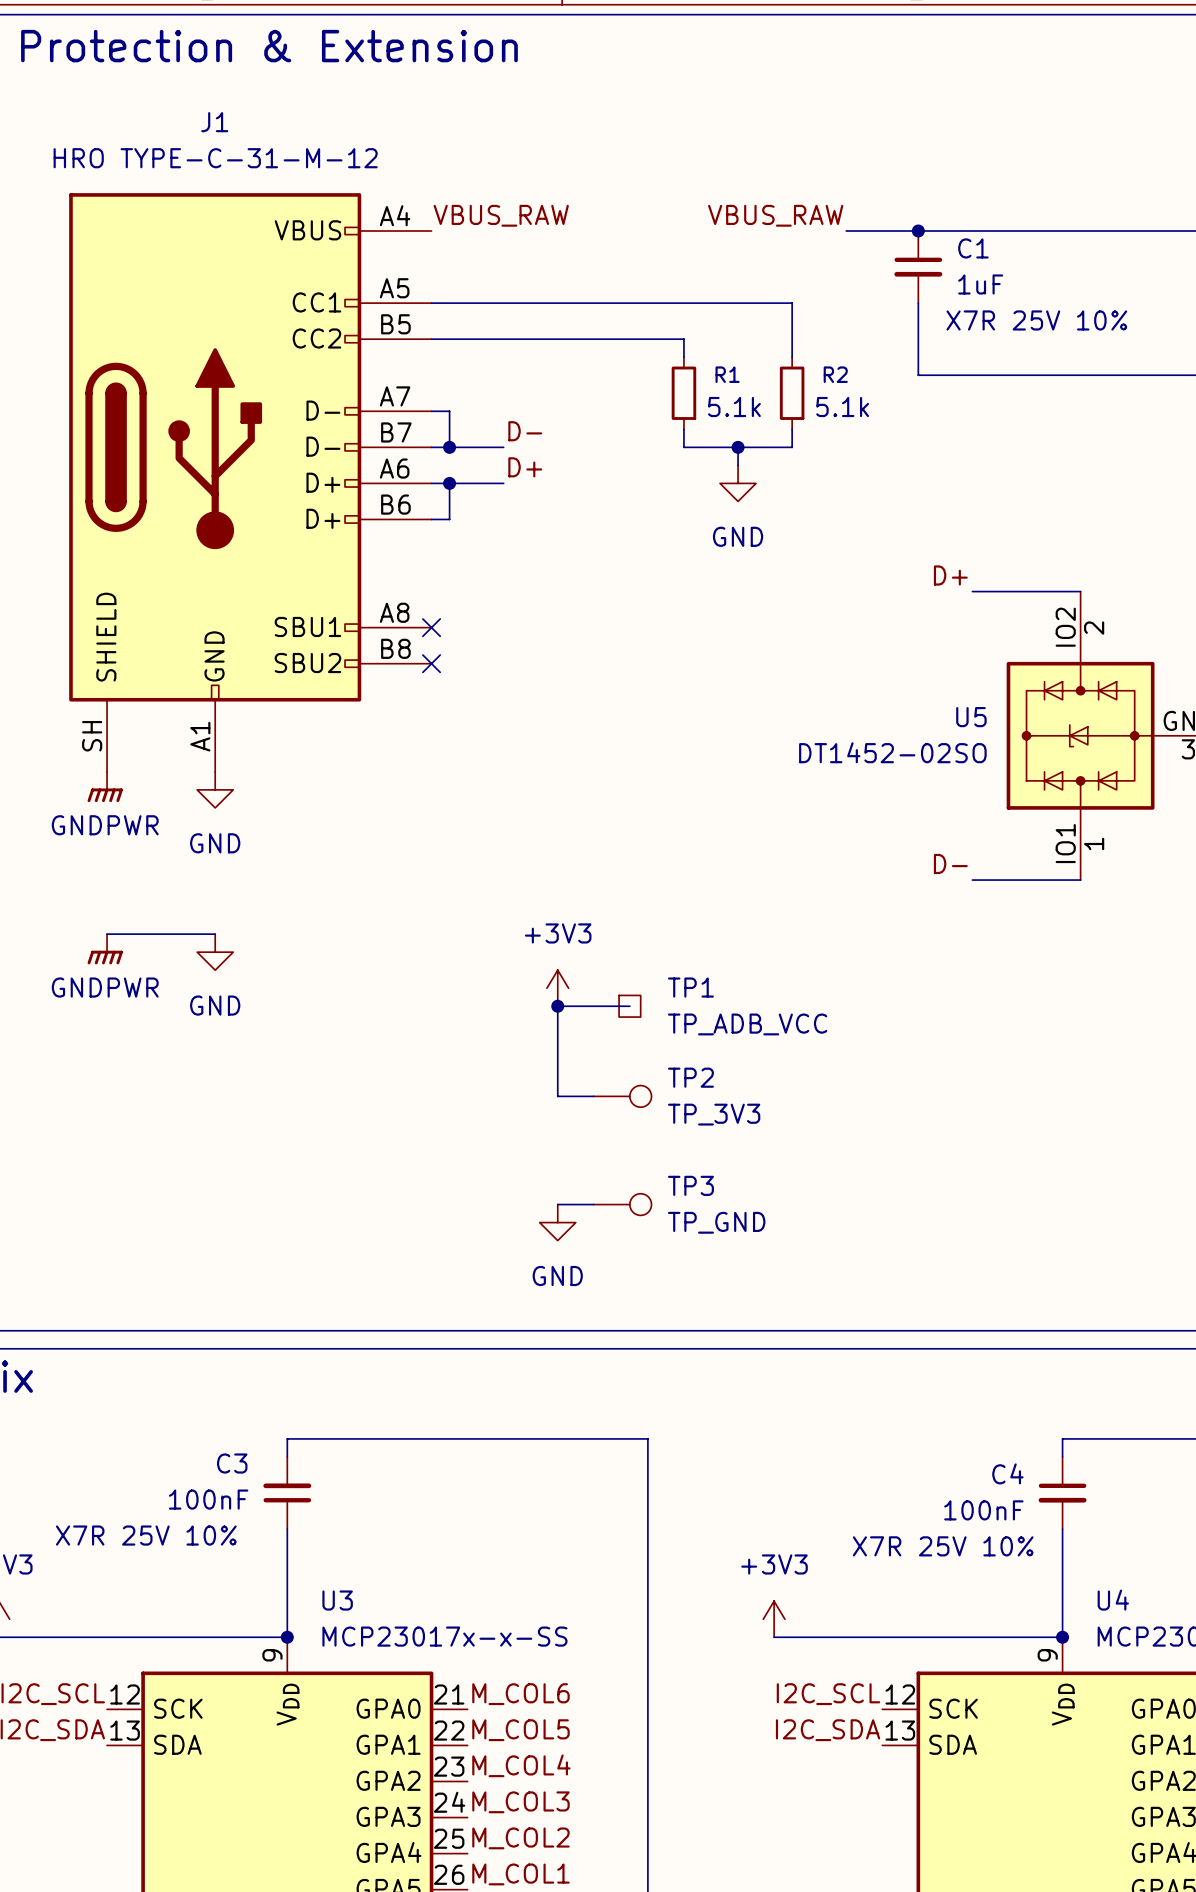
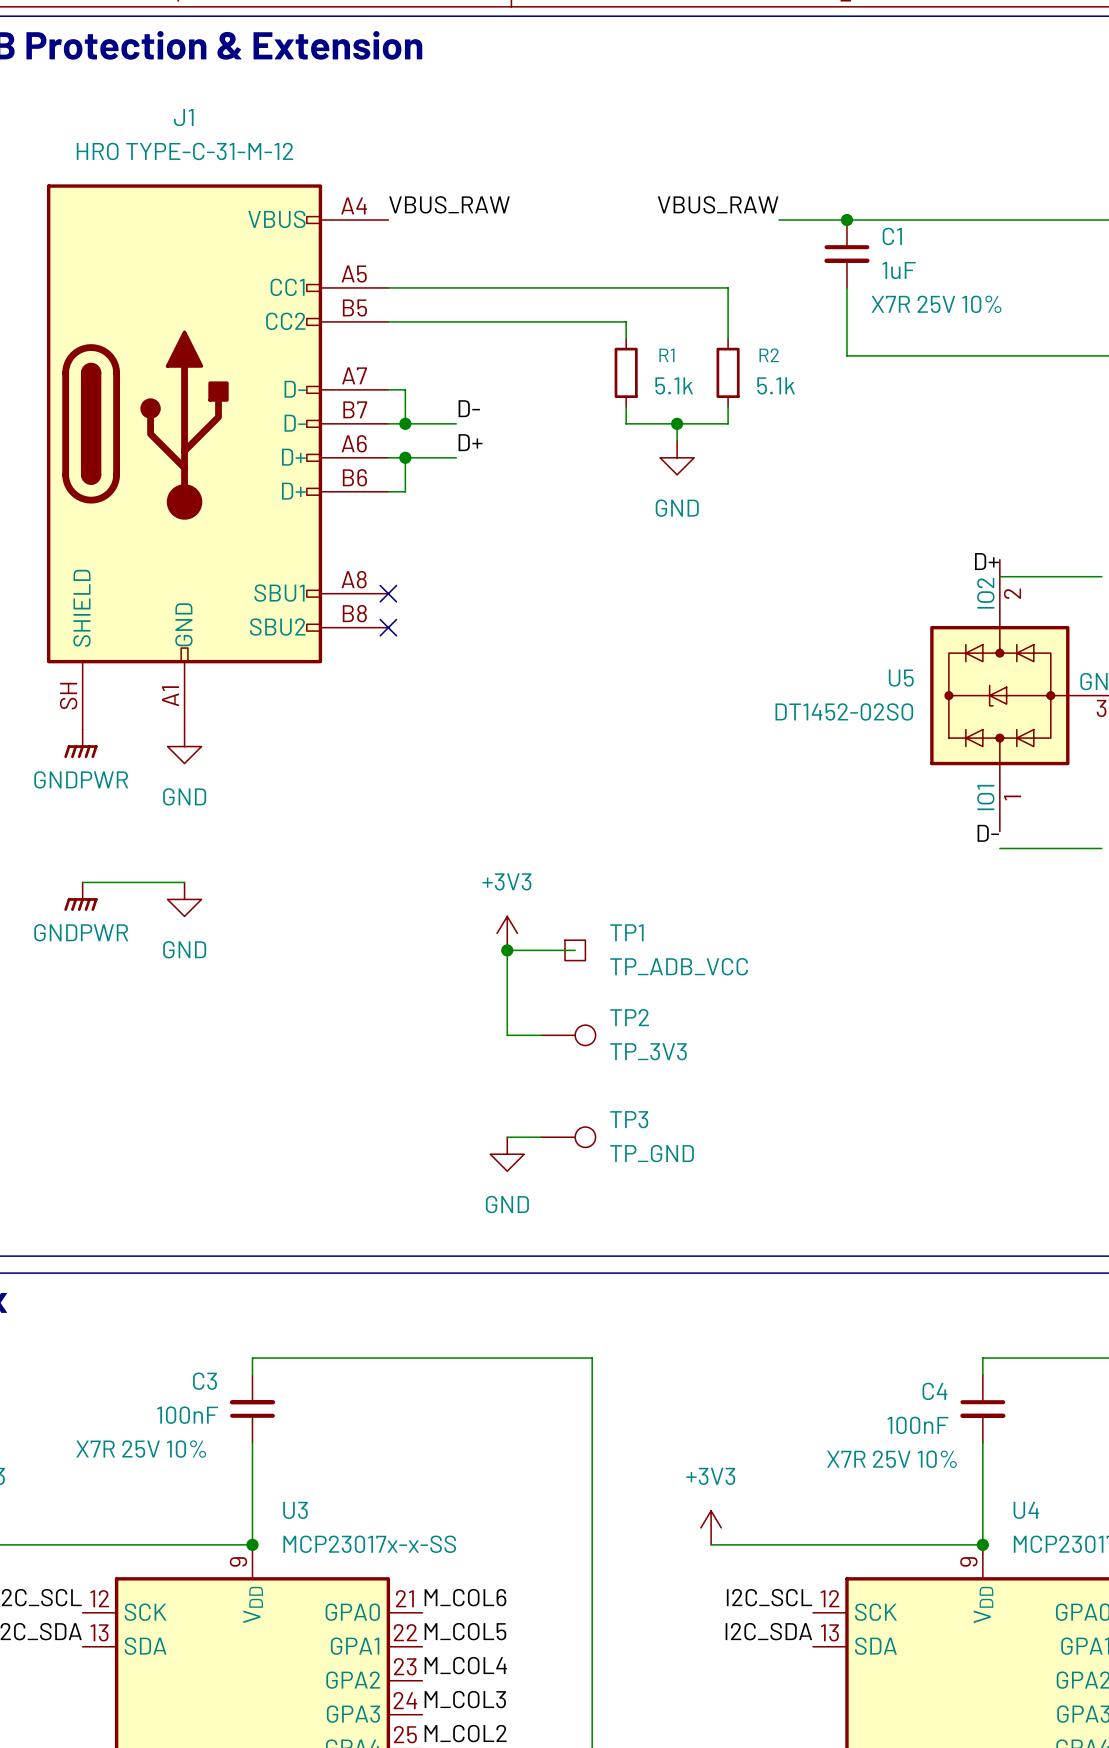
label position: D+ (950, 575) -> D+ (986, 561)
wire: (972, 591) (1080, 591) -> (999, 576) (1101, 576)
label position: D- (950, 863) -> D- (988, 833)
wire: (972, 880) (1080, 880) -> (999, 848) (1101, 848)

